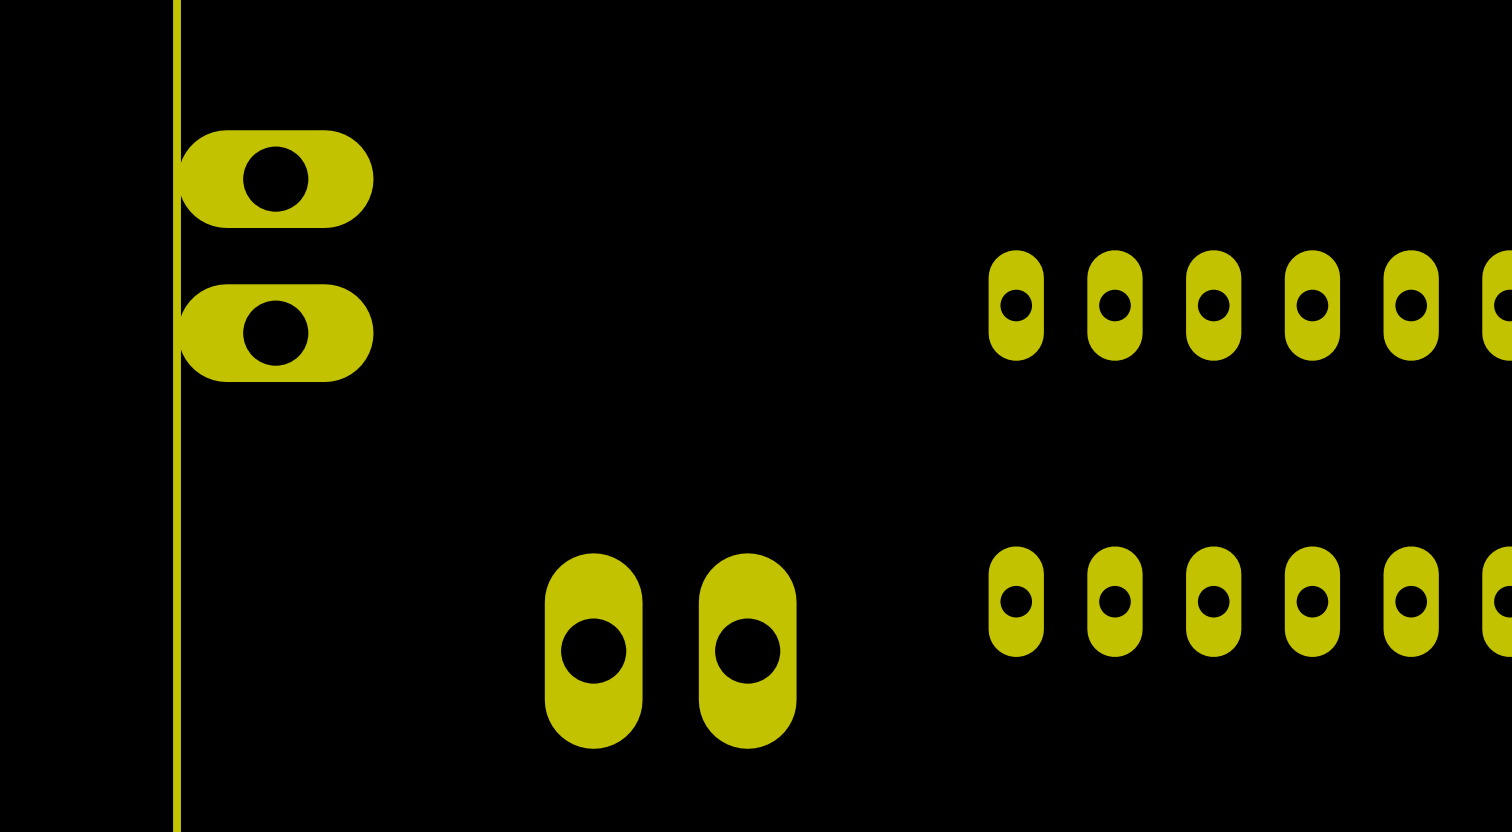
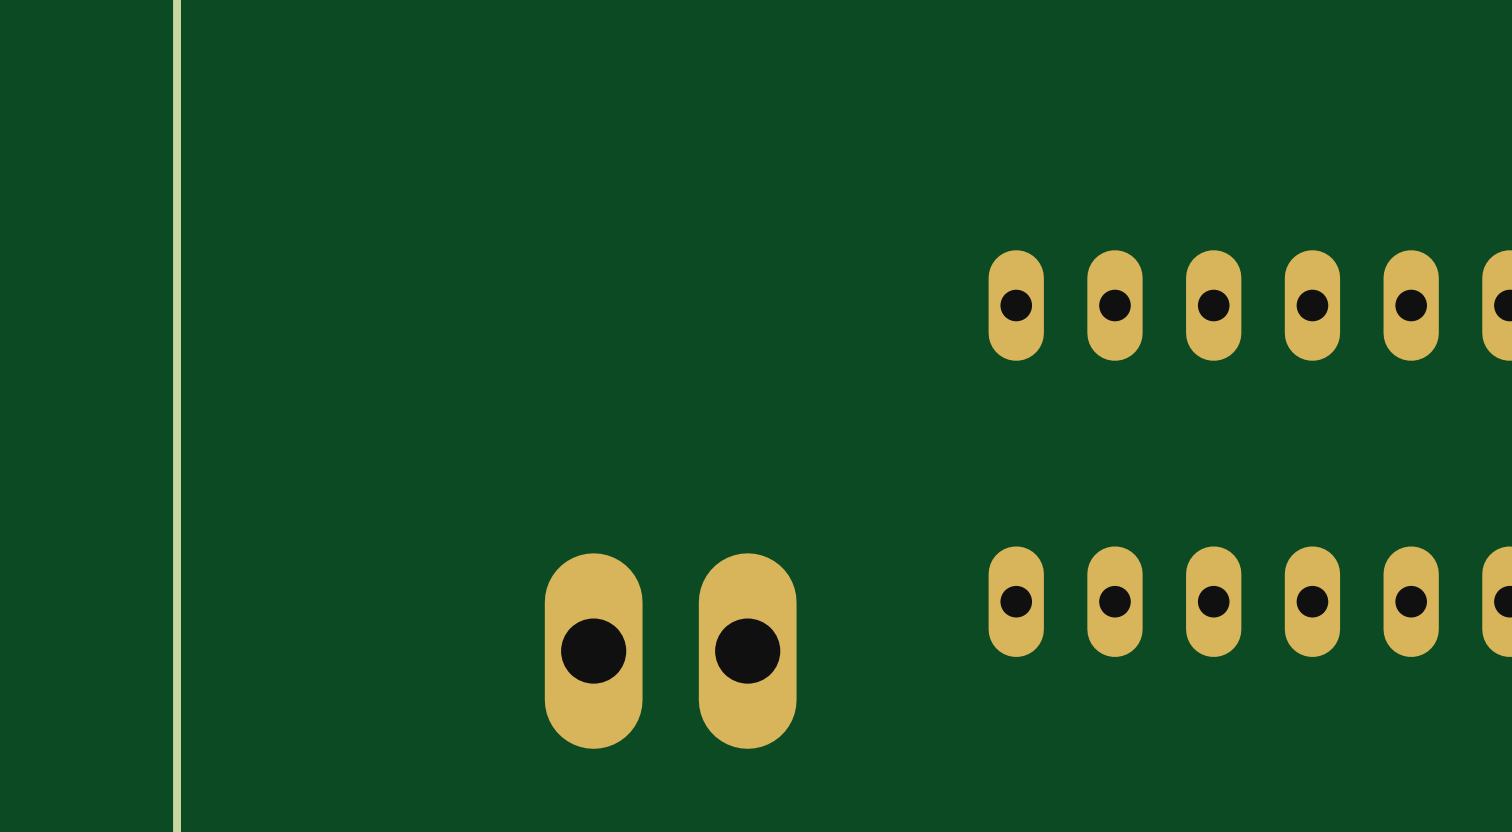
part: (275, 256) -> none

